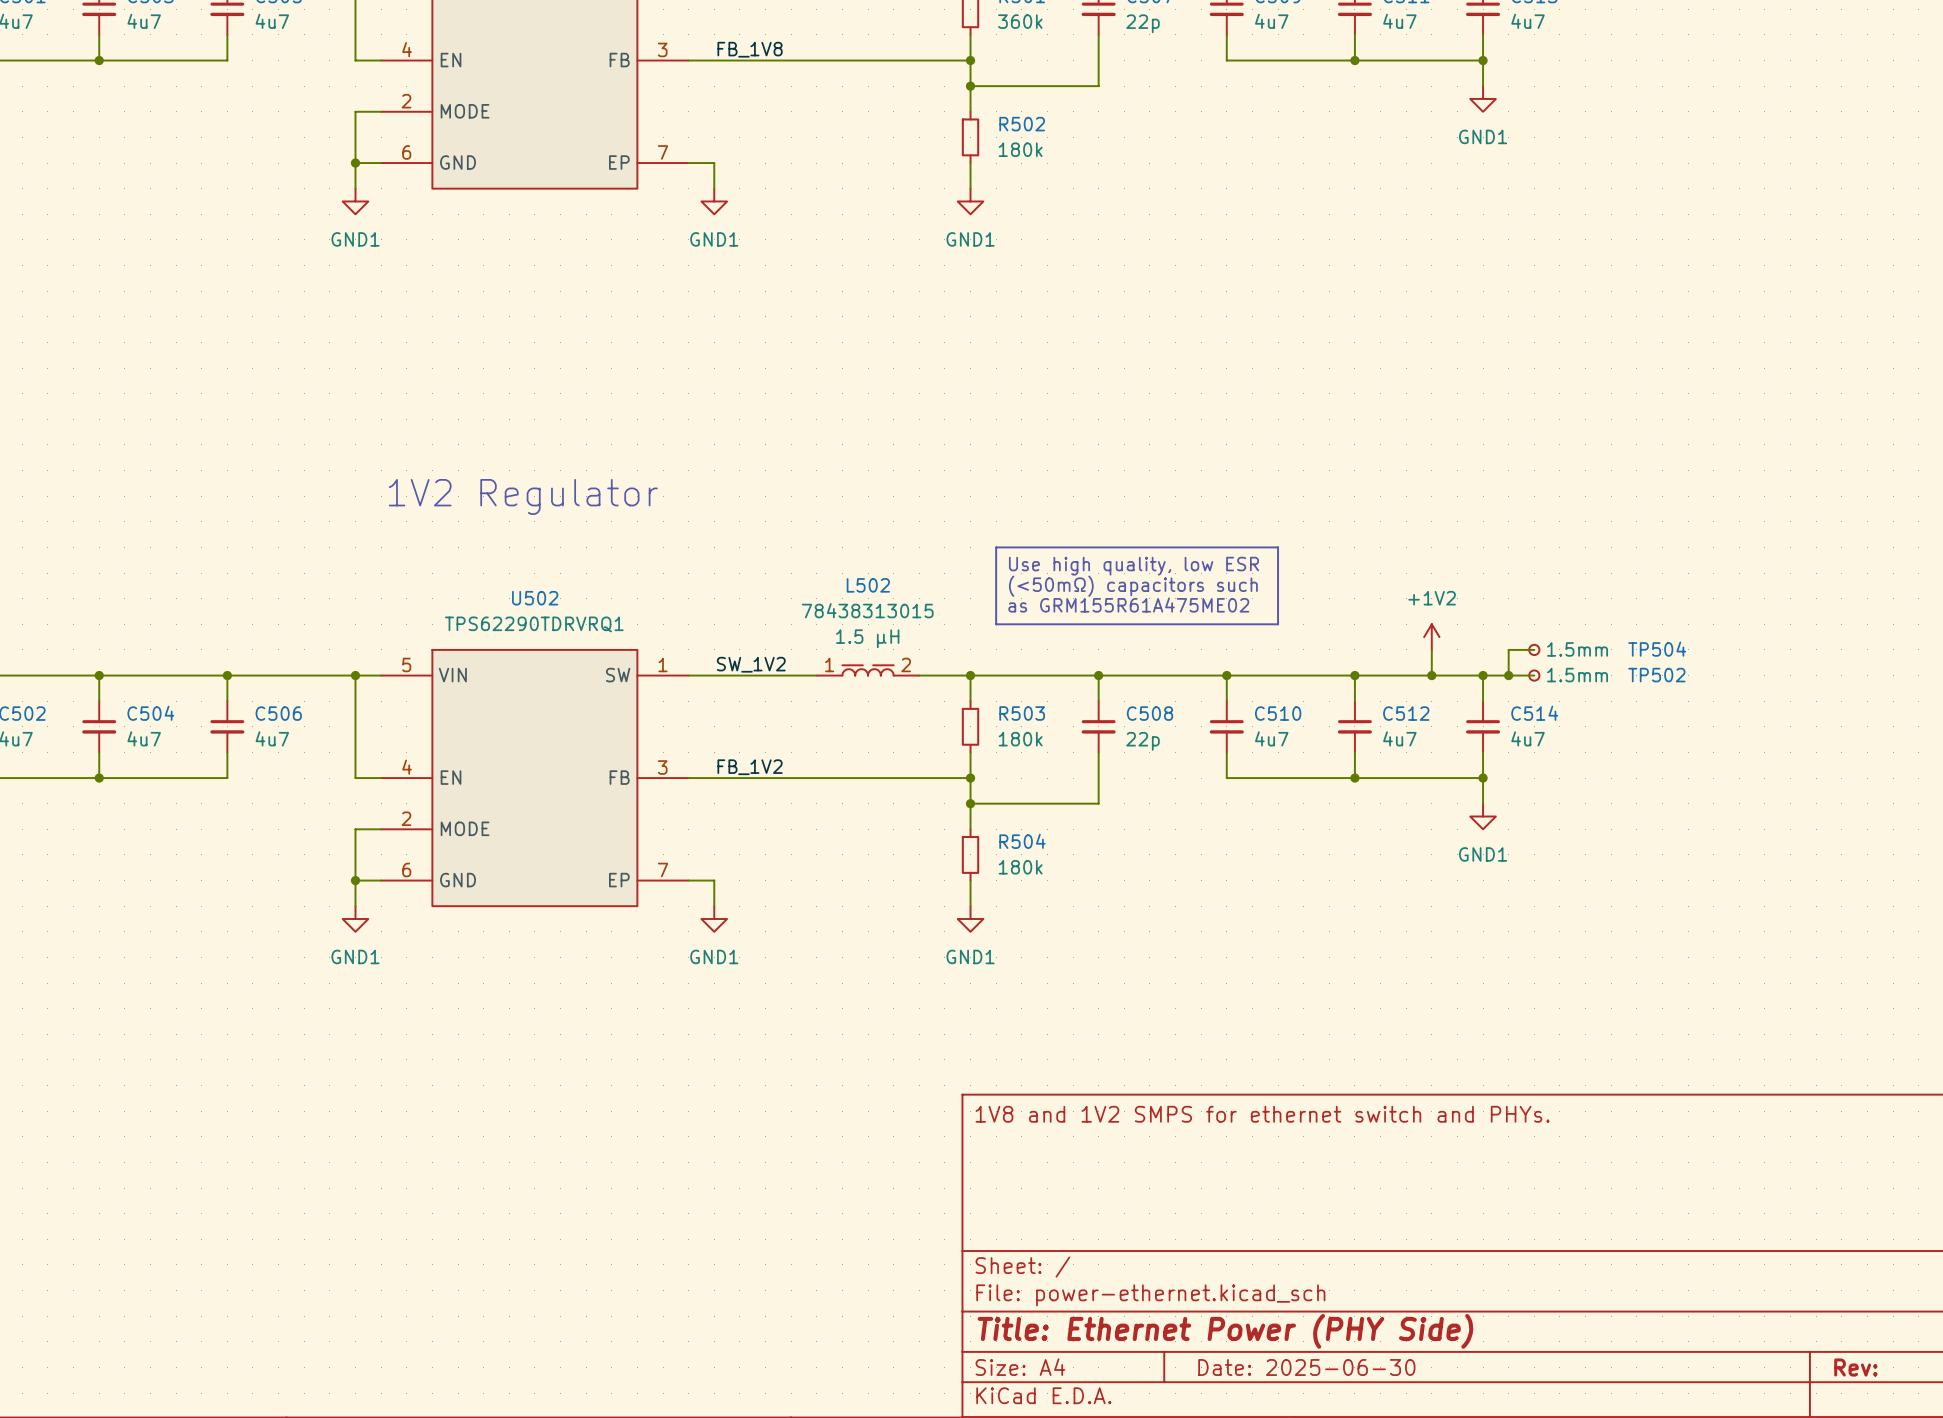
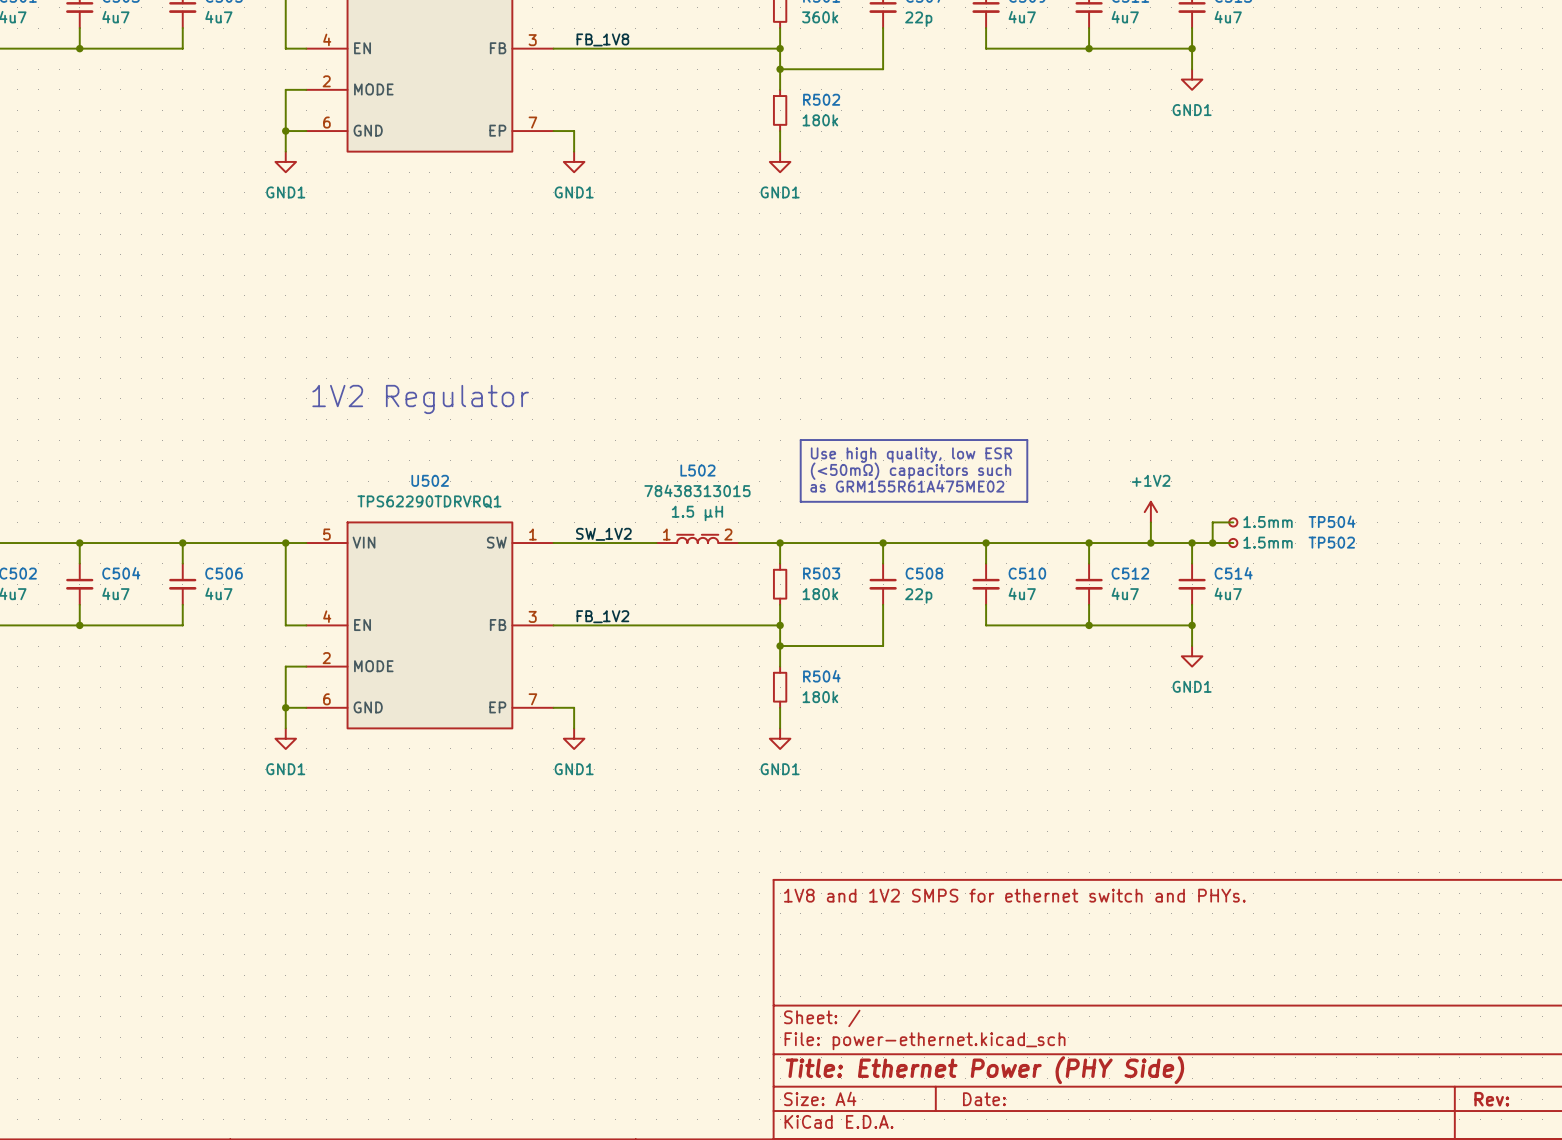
title block: Date: 2025-06-30 (1306, 1367) -> Date: (984, 1099)

